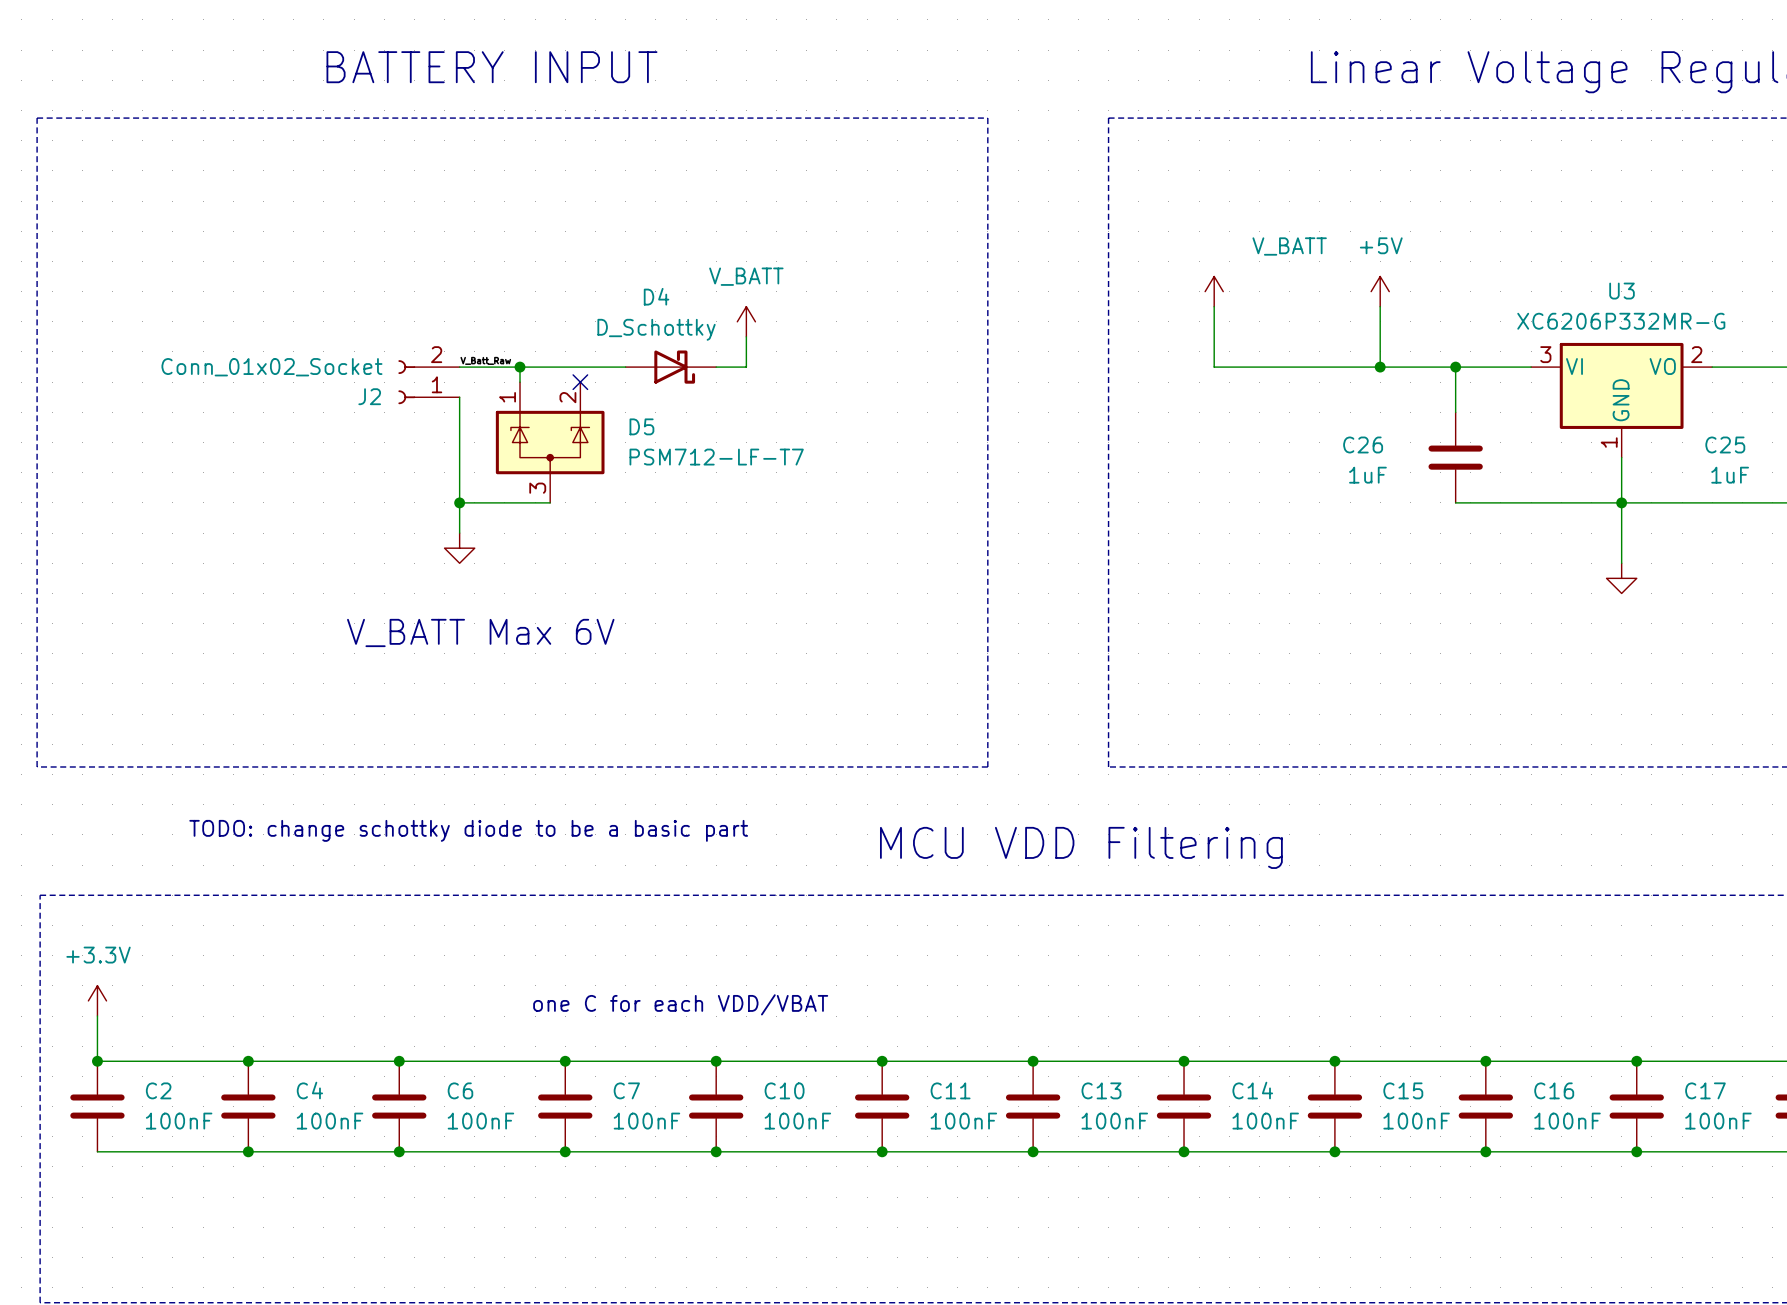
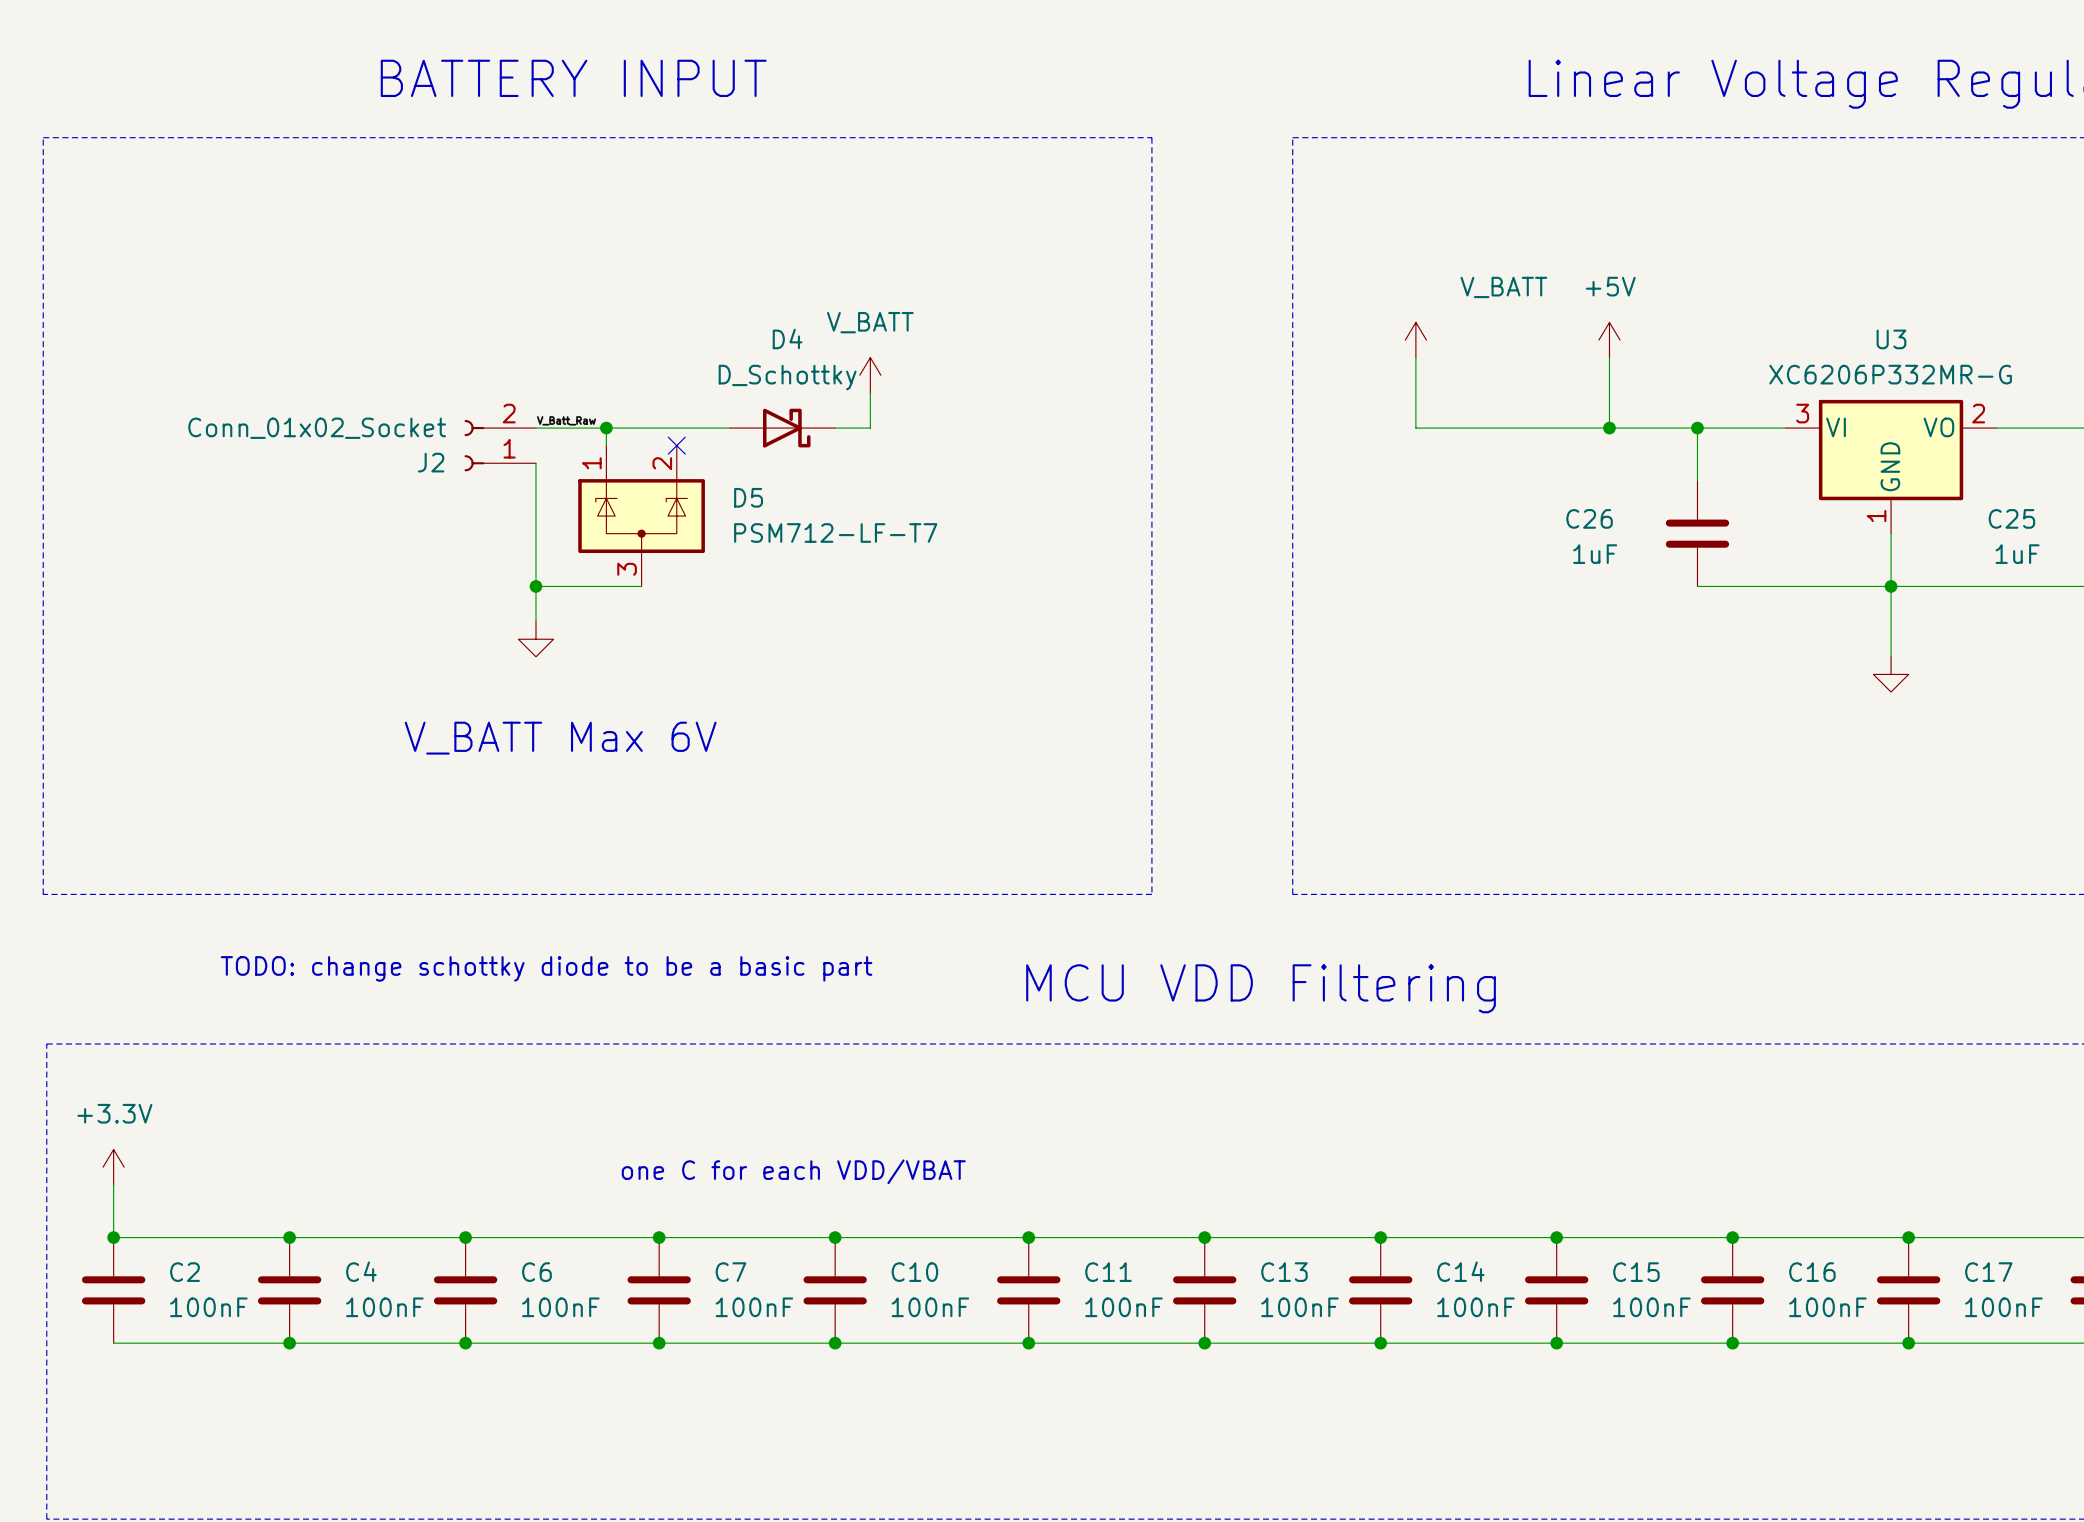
D4 name position: D4 (656, 296) -> D4 (787, 338)
D4 value position: D_Schottky (656, 329) -> D_Schottky (787, 377)

